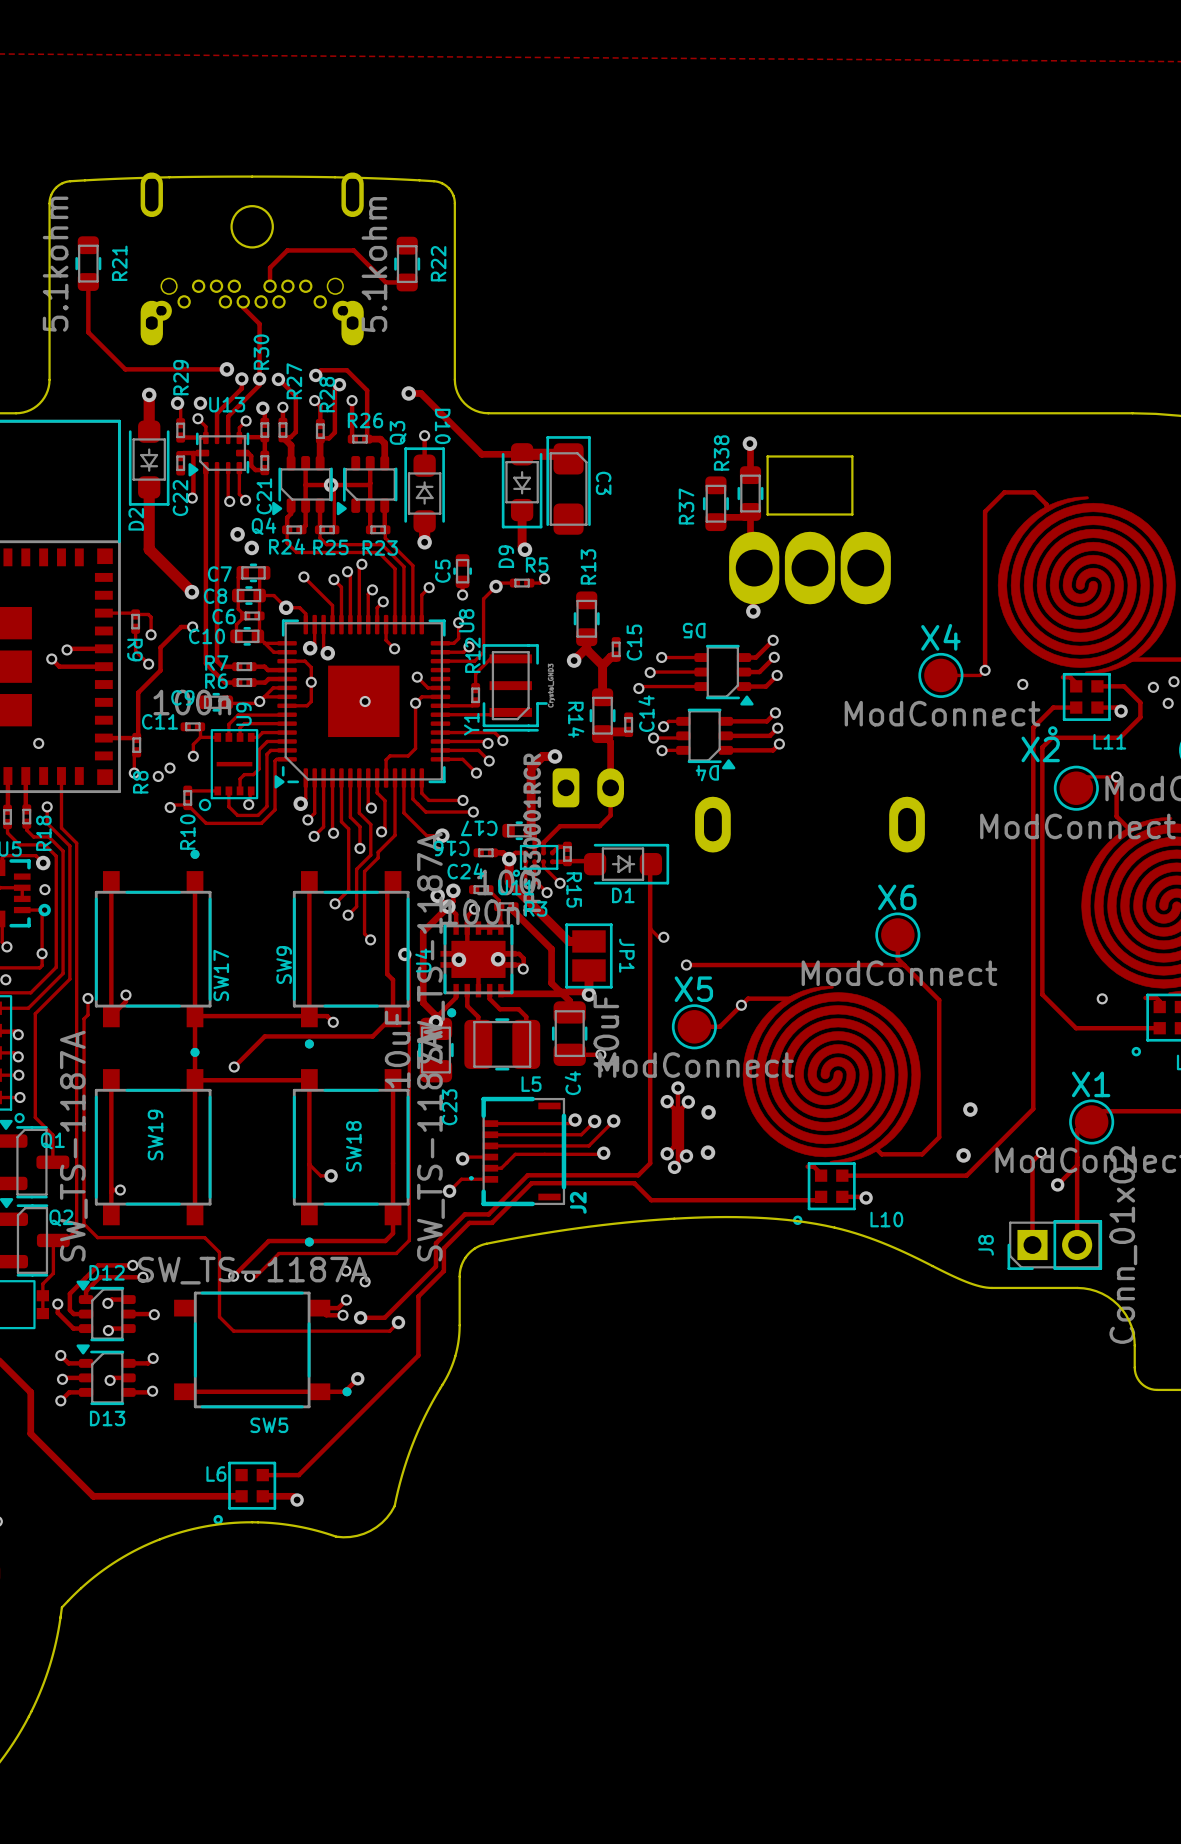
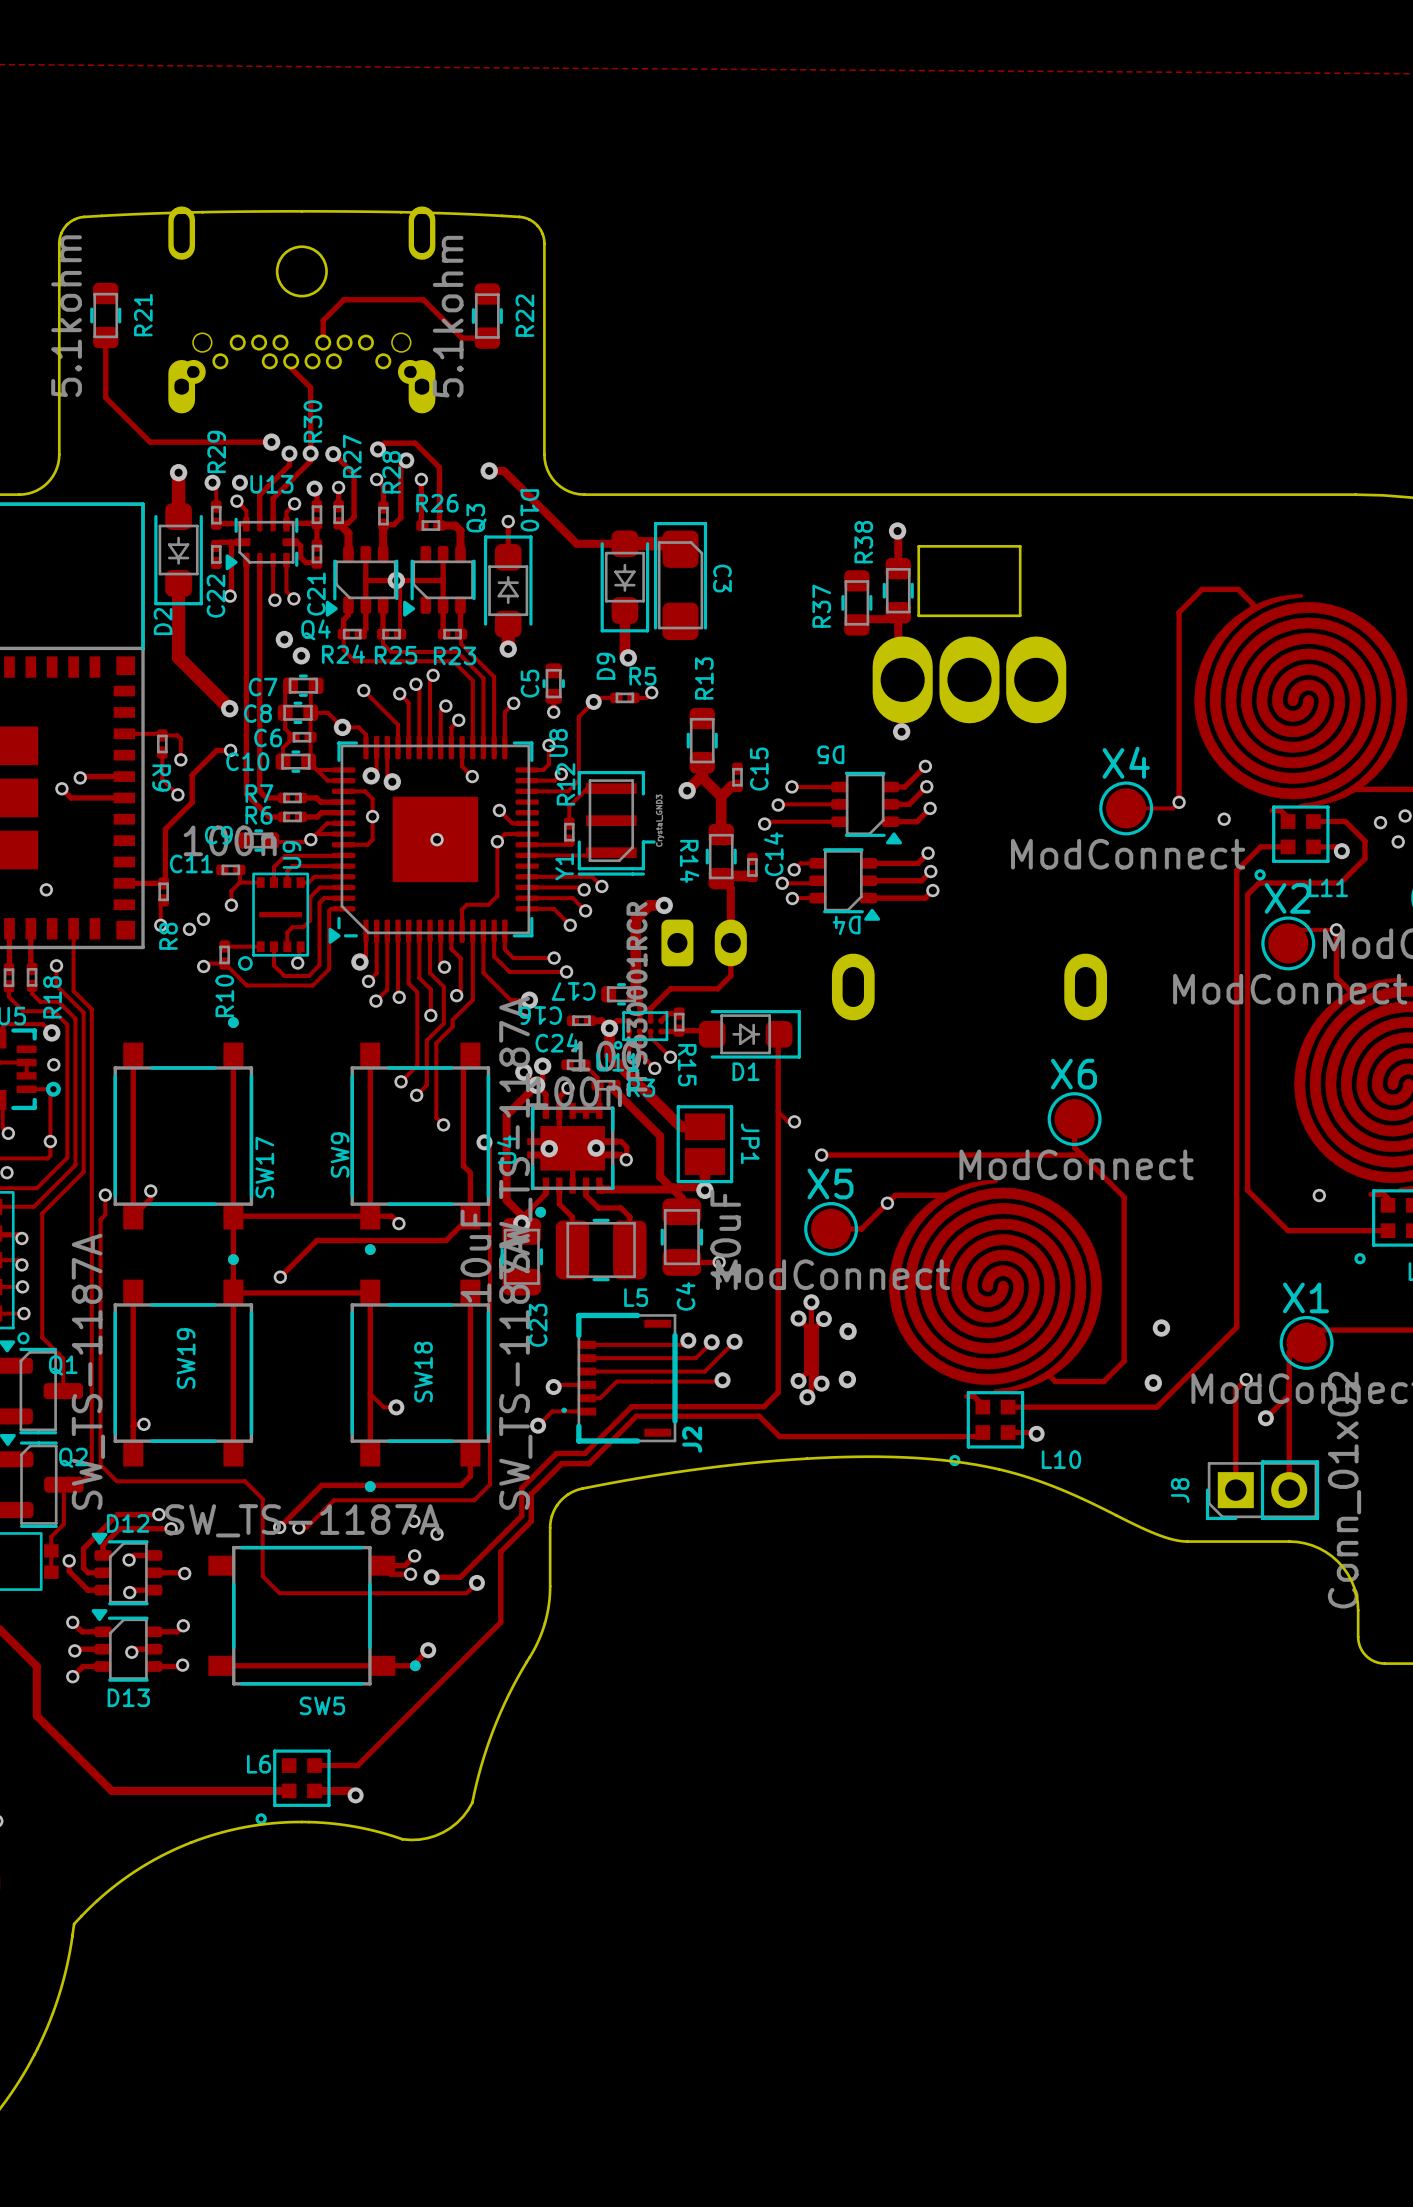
X2 name position: X2 (1040, 749) -> X2 (1287, 898)

